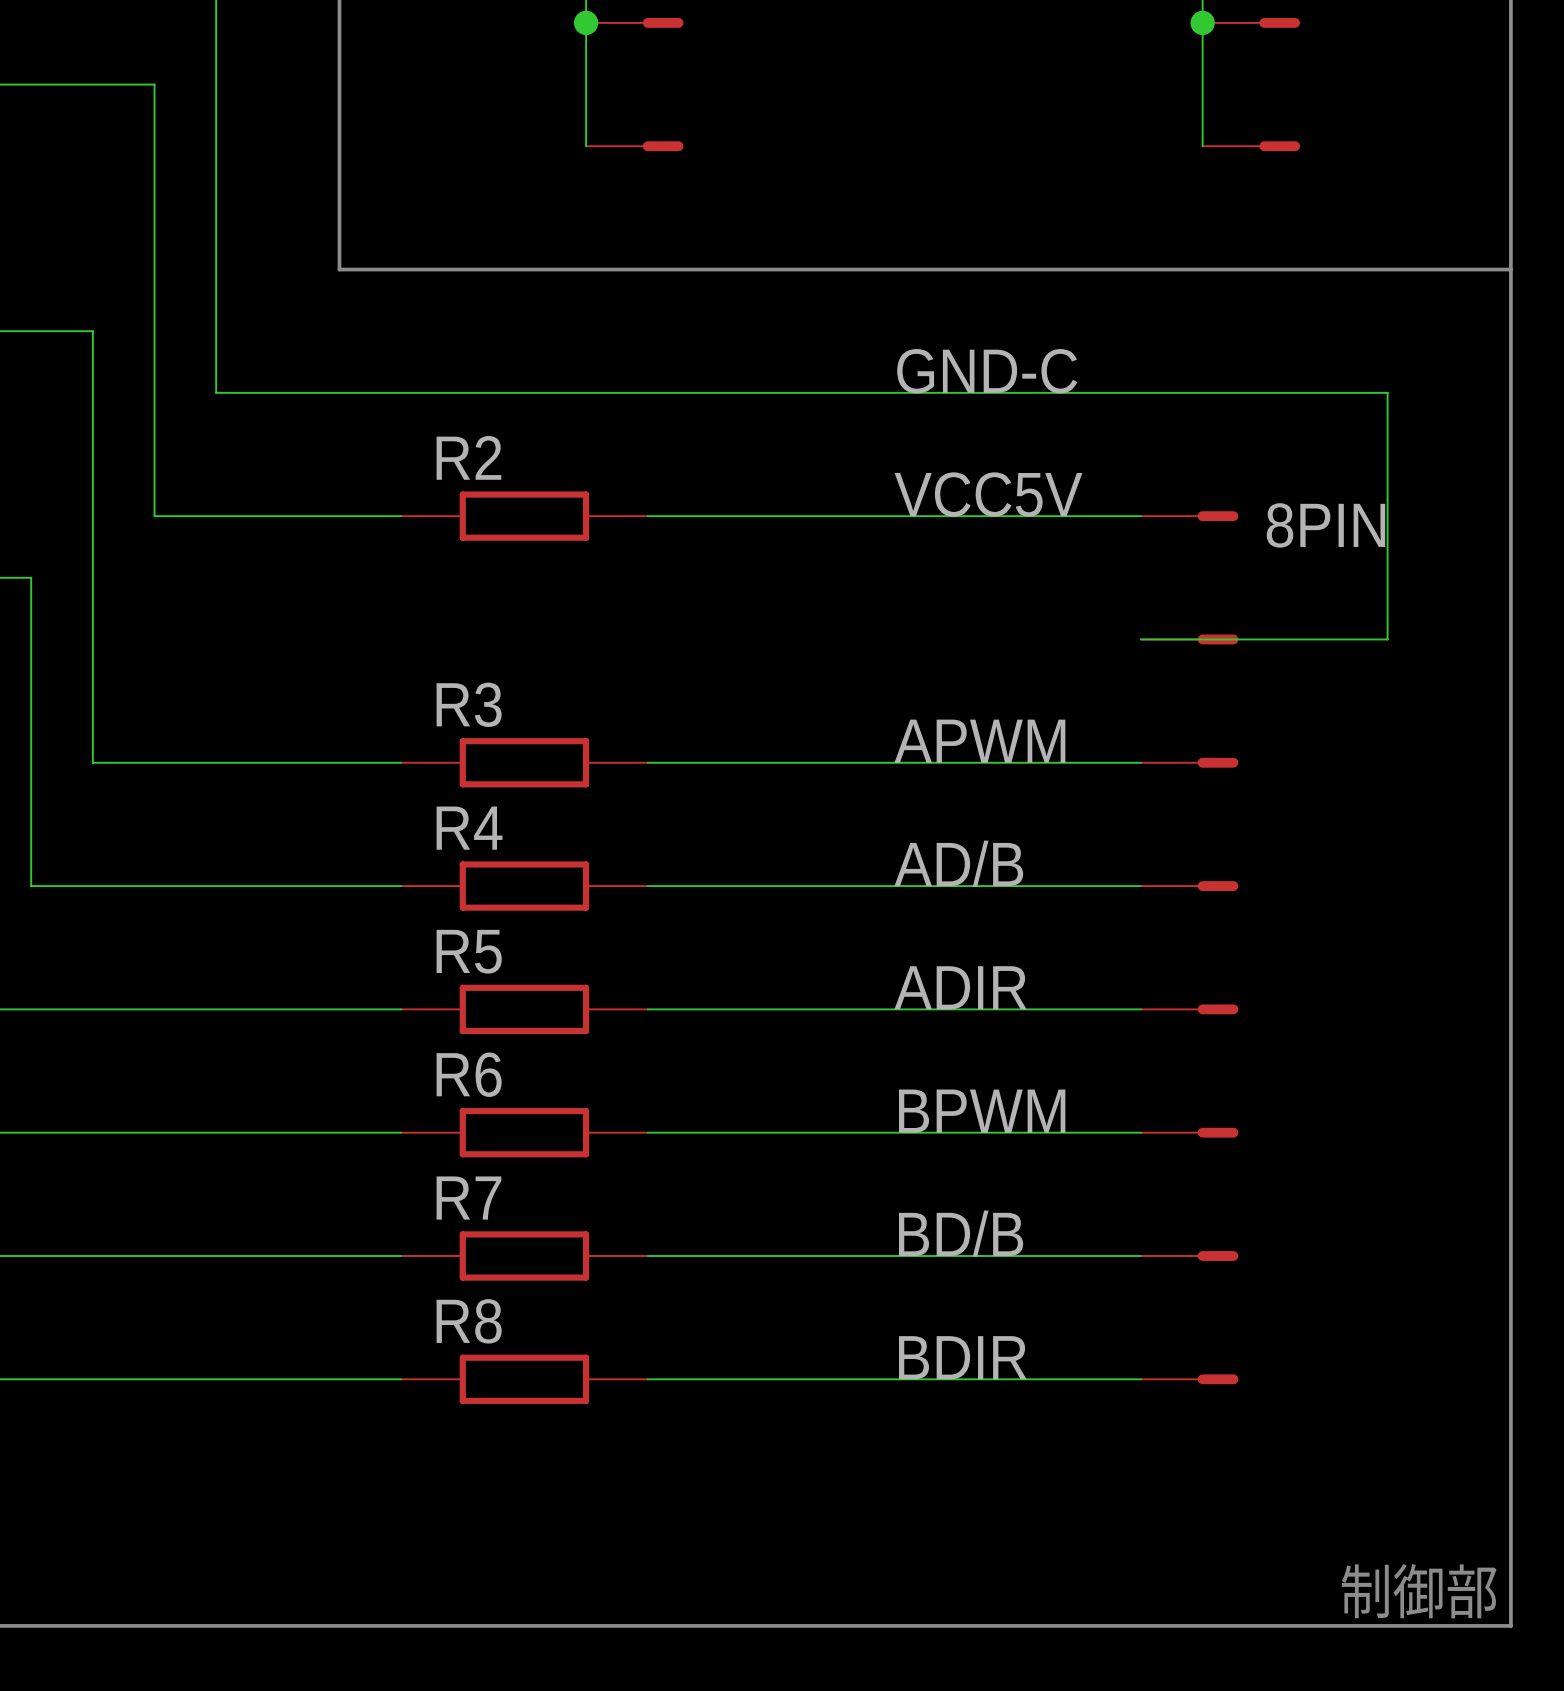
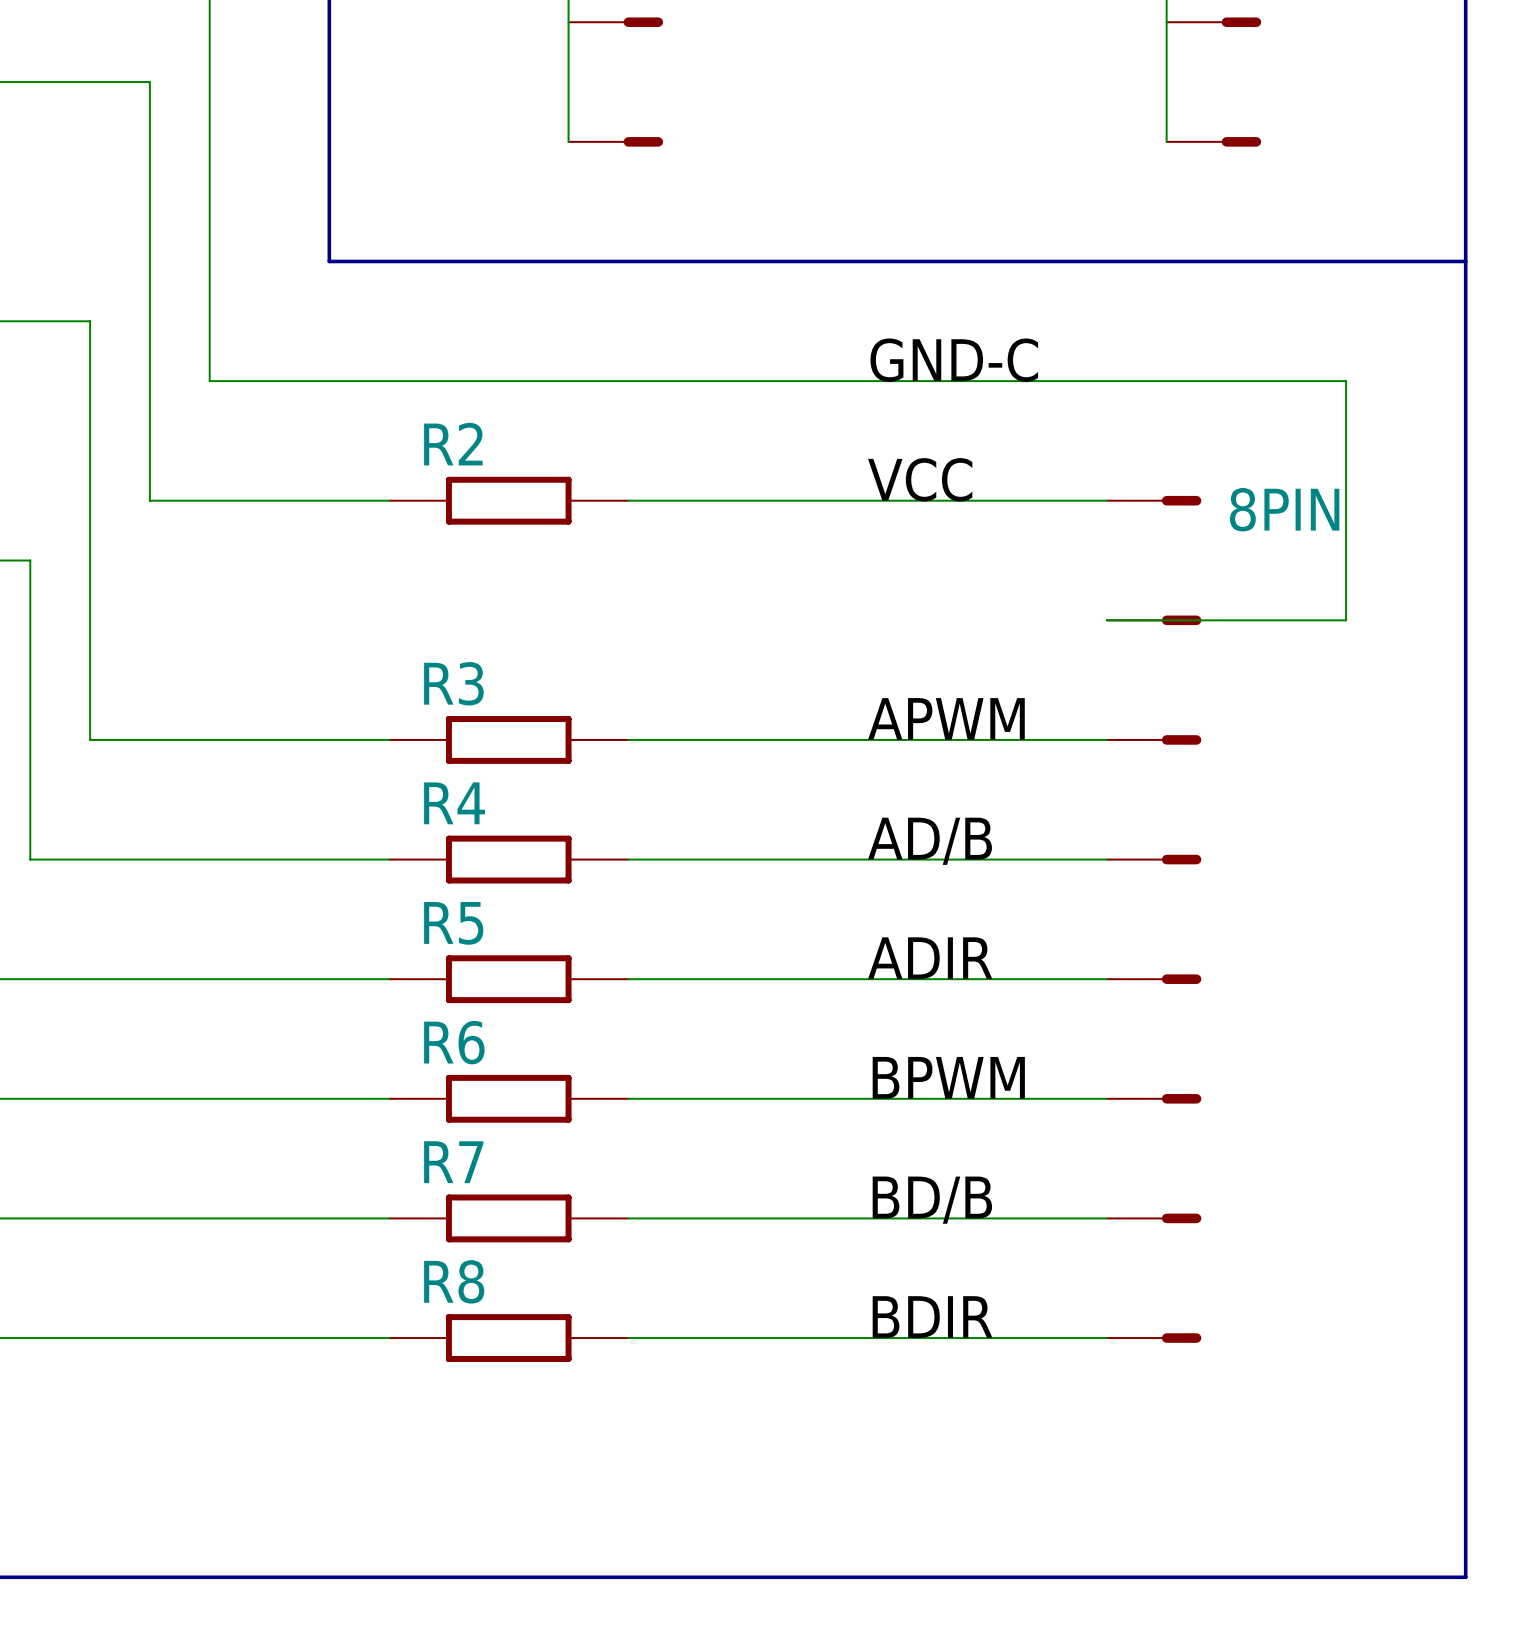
junction: (586, 22) -> none
junction: (1202, 22) -> none
label: VCC5V (988, 494) -> VCC (920, 479)
text: 制御部 (1419, 1591) -> none

